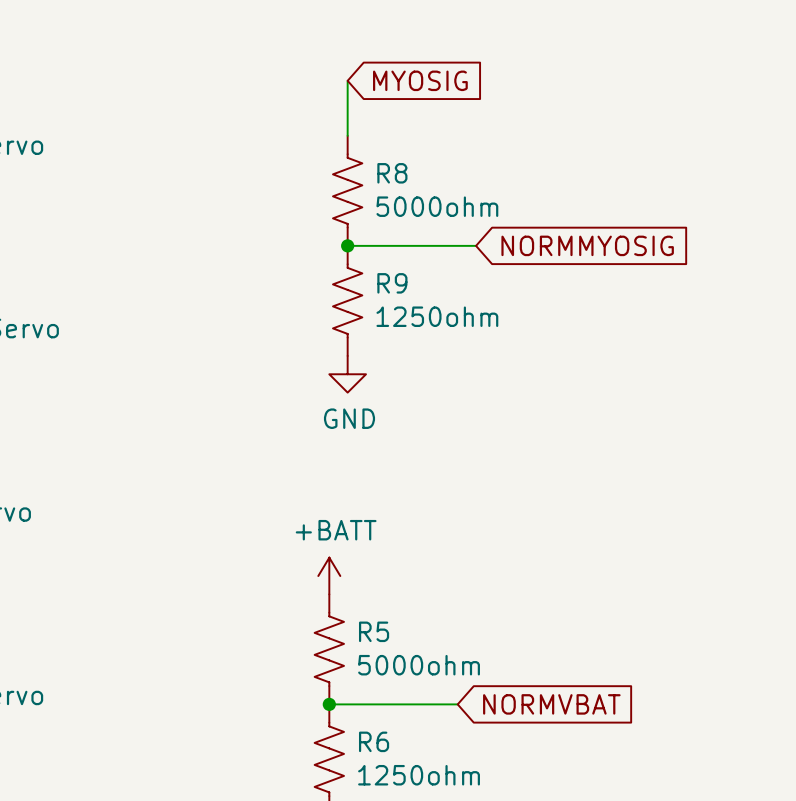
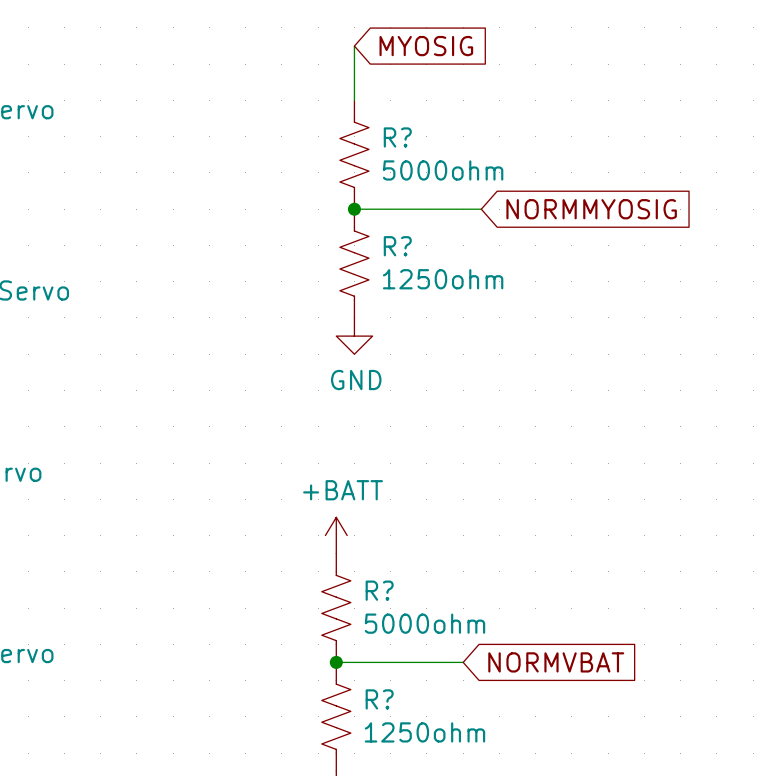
R8 name: R8 (392, 173) -> R? (397, 137)
R9 name: R9 (392, 283) -> R? (397, 246)
R5 name: R5 (374, 631) -> R? (379, 590)
R6 name: R6 (374, 741) -> R? (379, 699)

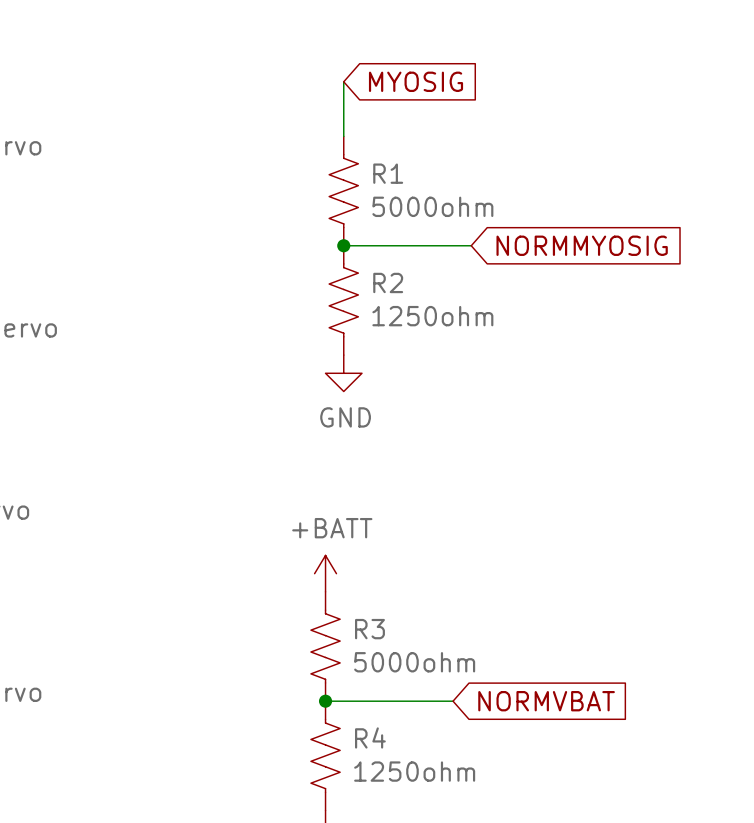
R? name: R? (397, 137) -> R1 (388, 173)
R? name: R? (397, 246) -> R2 (388, 282)
R? name: R? (379, 590) -> R3 (369, 629)
R? name: R? (379, 699) -> R4 (370, 737)

